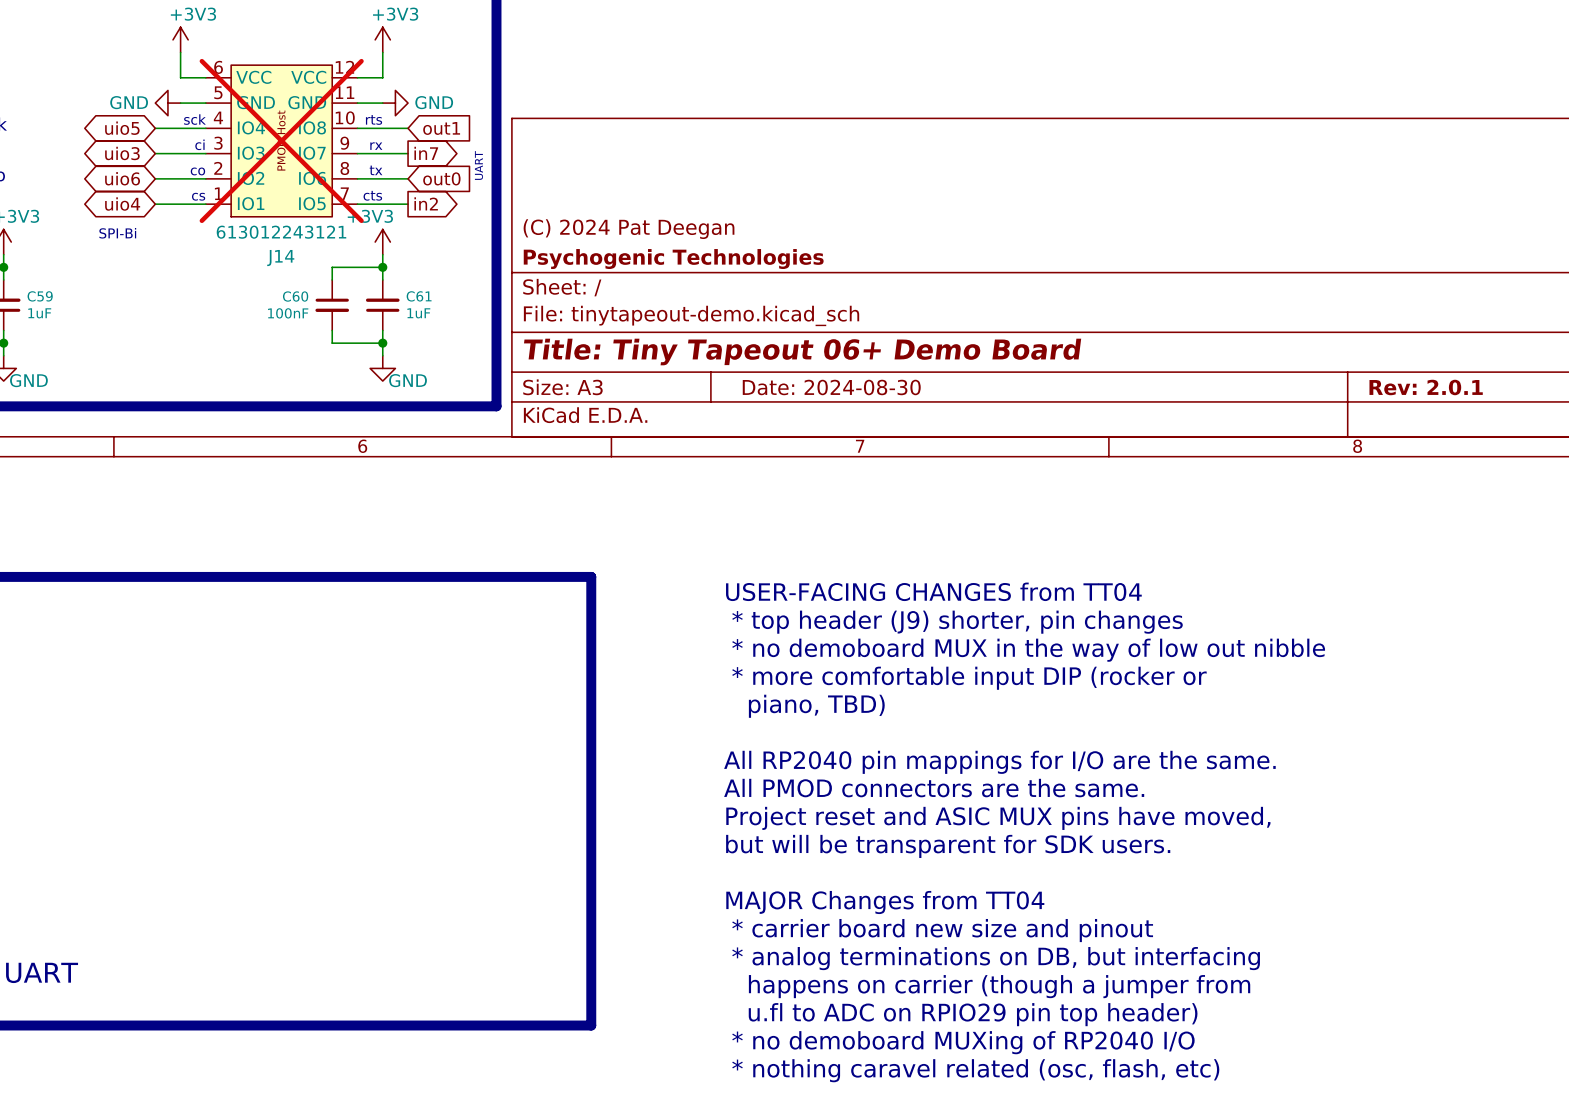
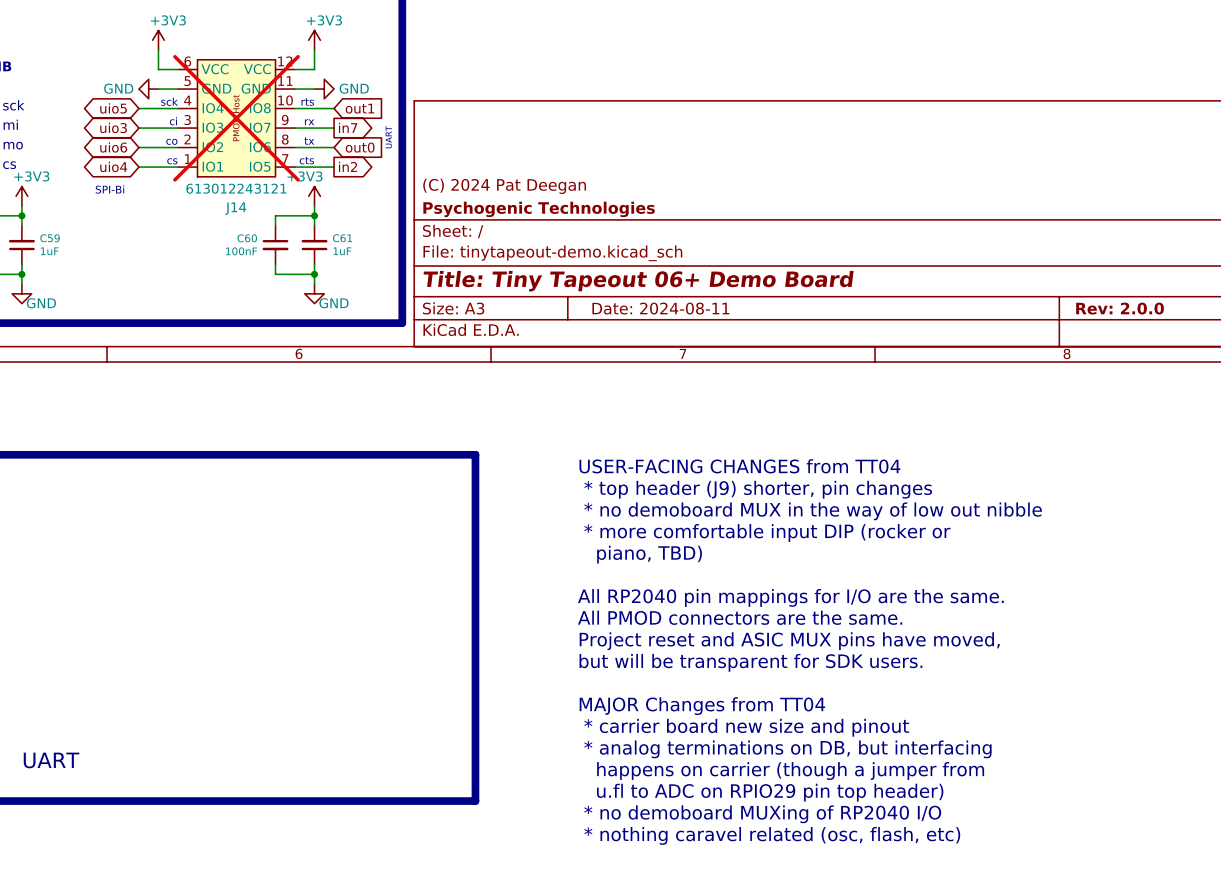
title block: Date: 2024-08-30 (831, 387) -> Date: 2024-08-11 (660, 308)
title block: Rev: 2.0.1 (1426, 387) -> Rev: 2.0.0 (1120, 308)

